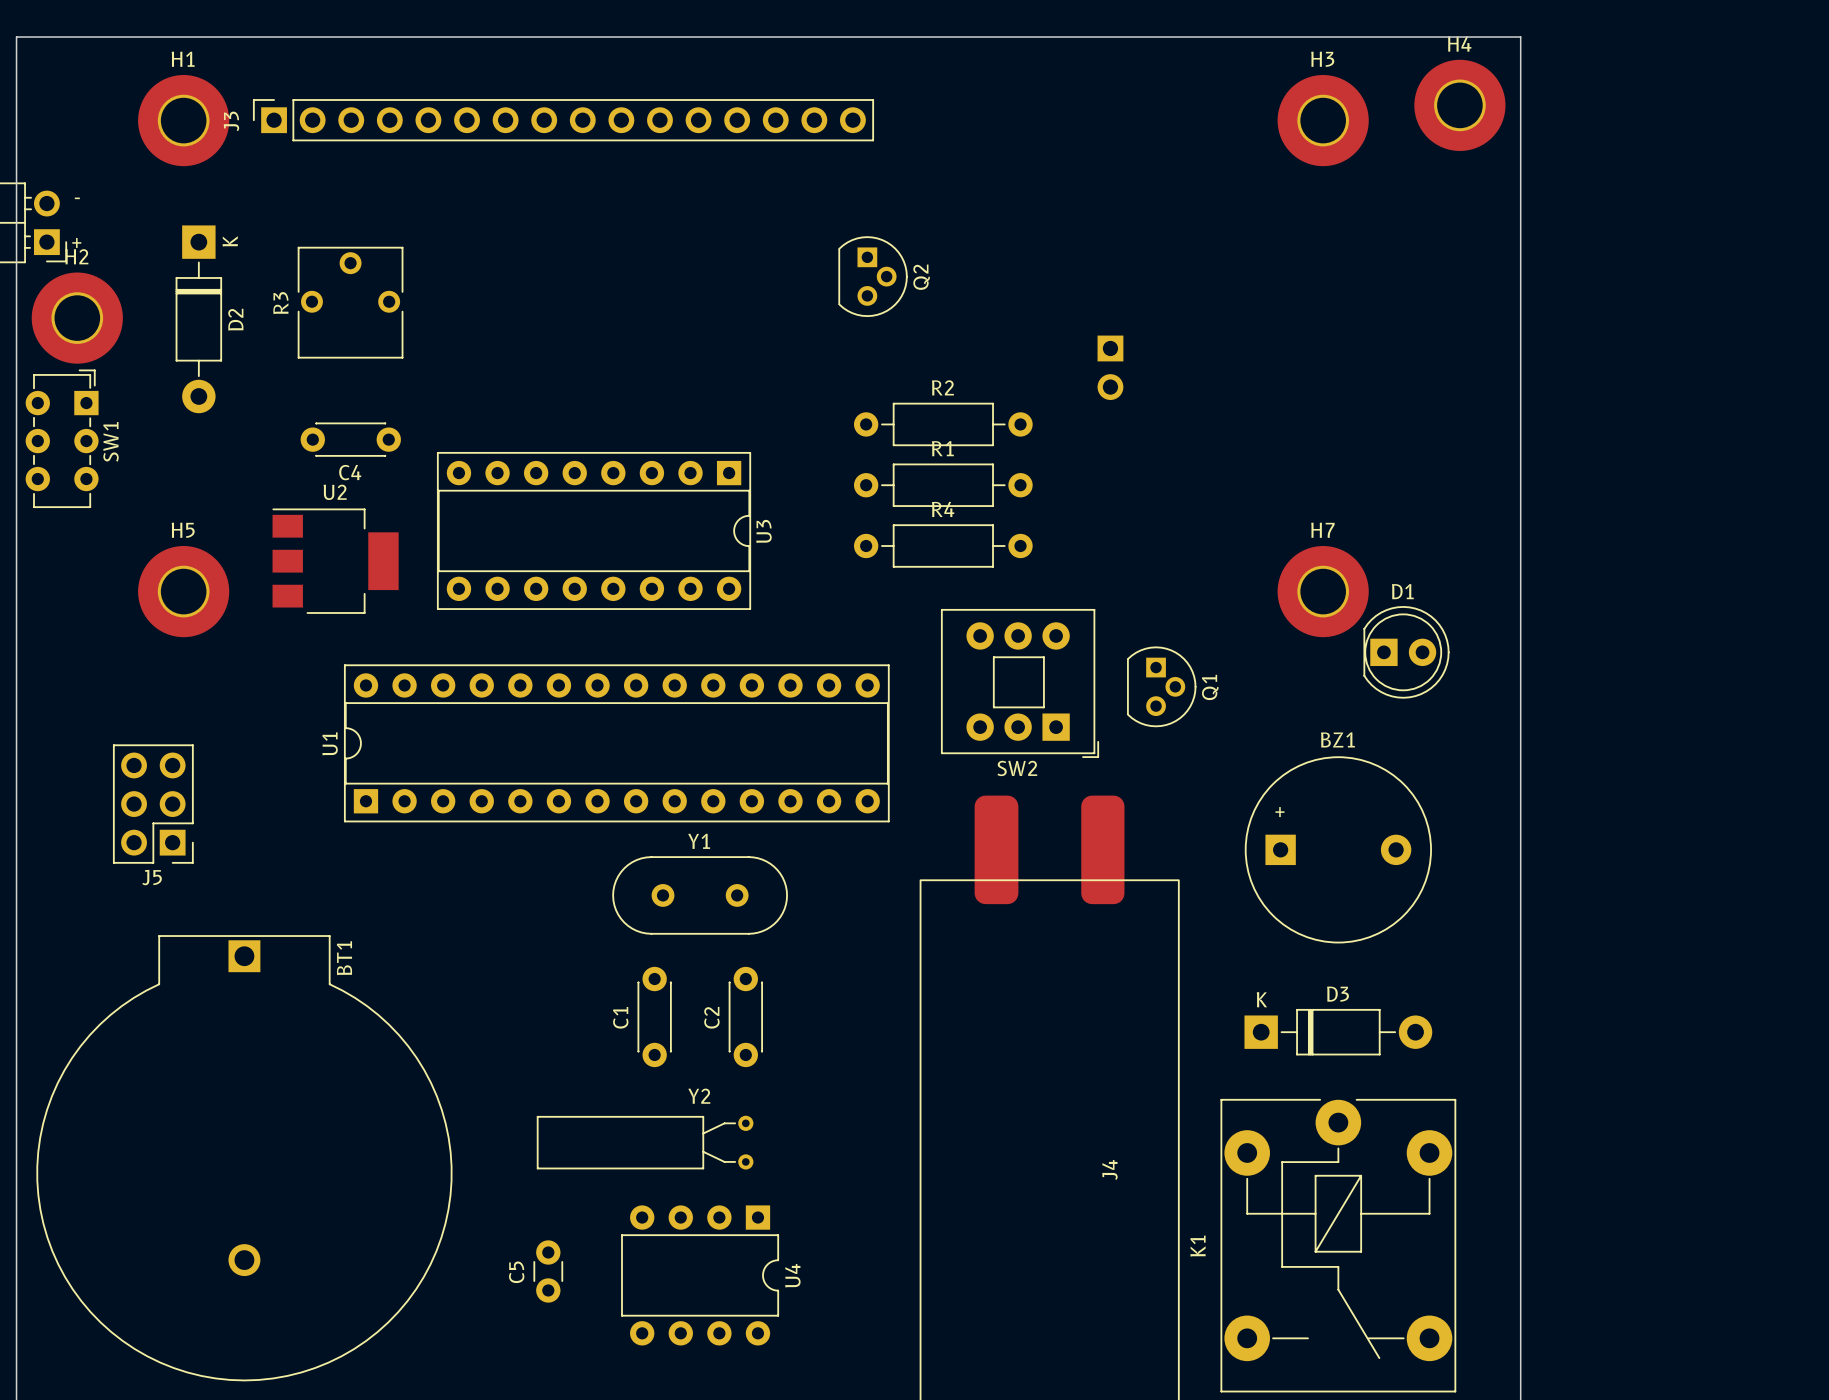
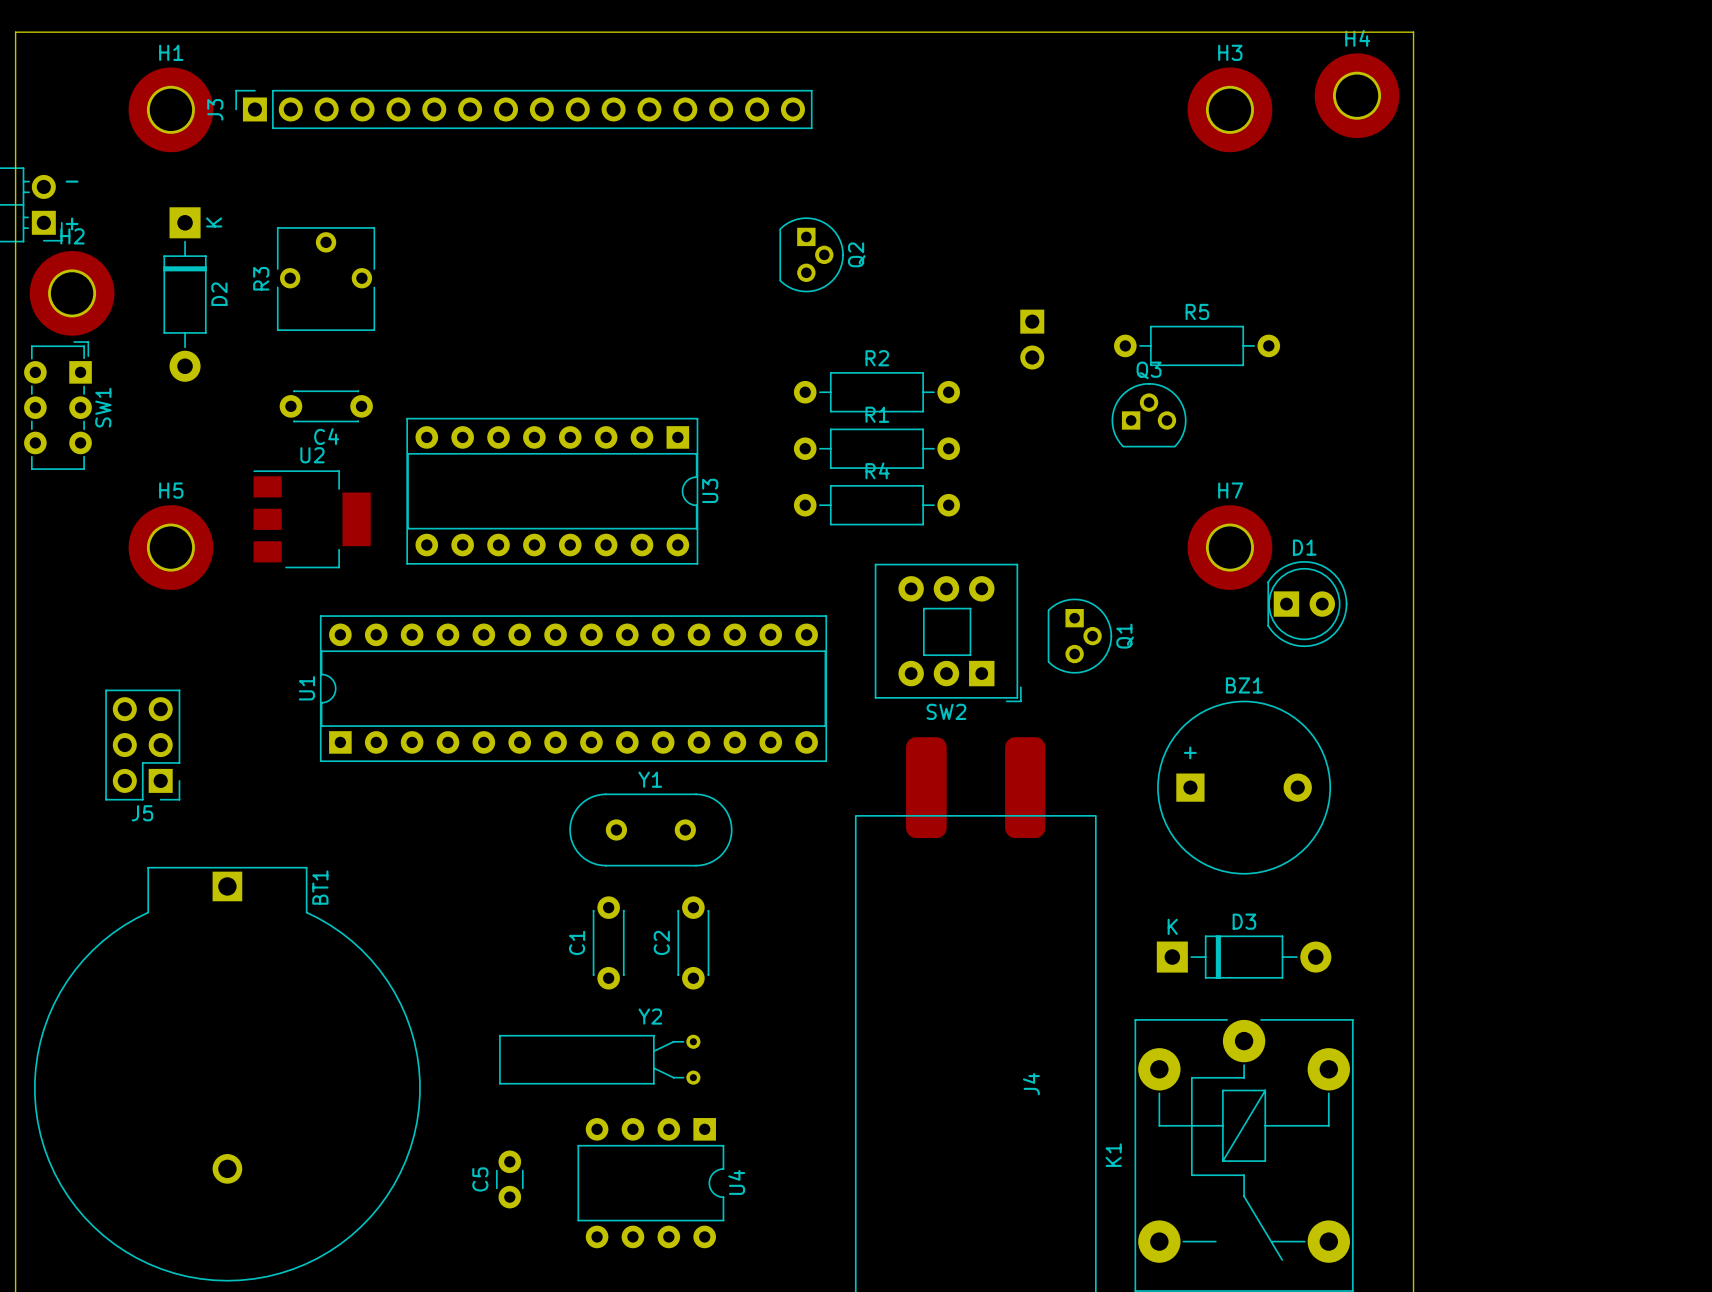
R5: none -> (1197, 345)
Q3: none -> (1149, 415)

